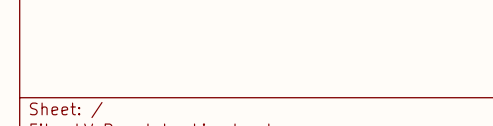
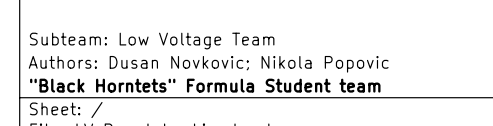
title block: none -> Subteam: Low Voltage Team (152, 41)
title block: none -> Authors: Dusan Novkovic; Nikola Popovic (208, 64)
title block: none -> "Black Horntets" Formula Student team (205, 85)

